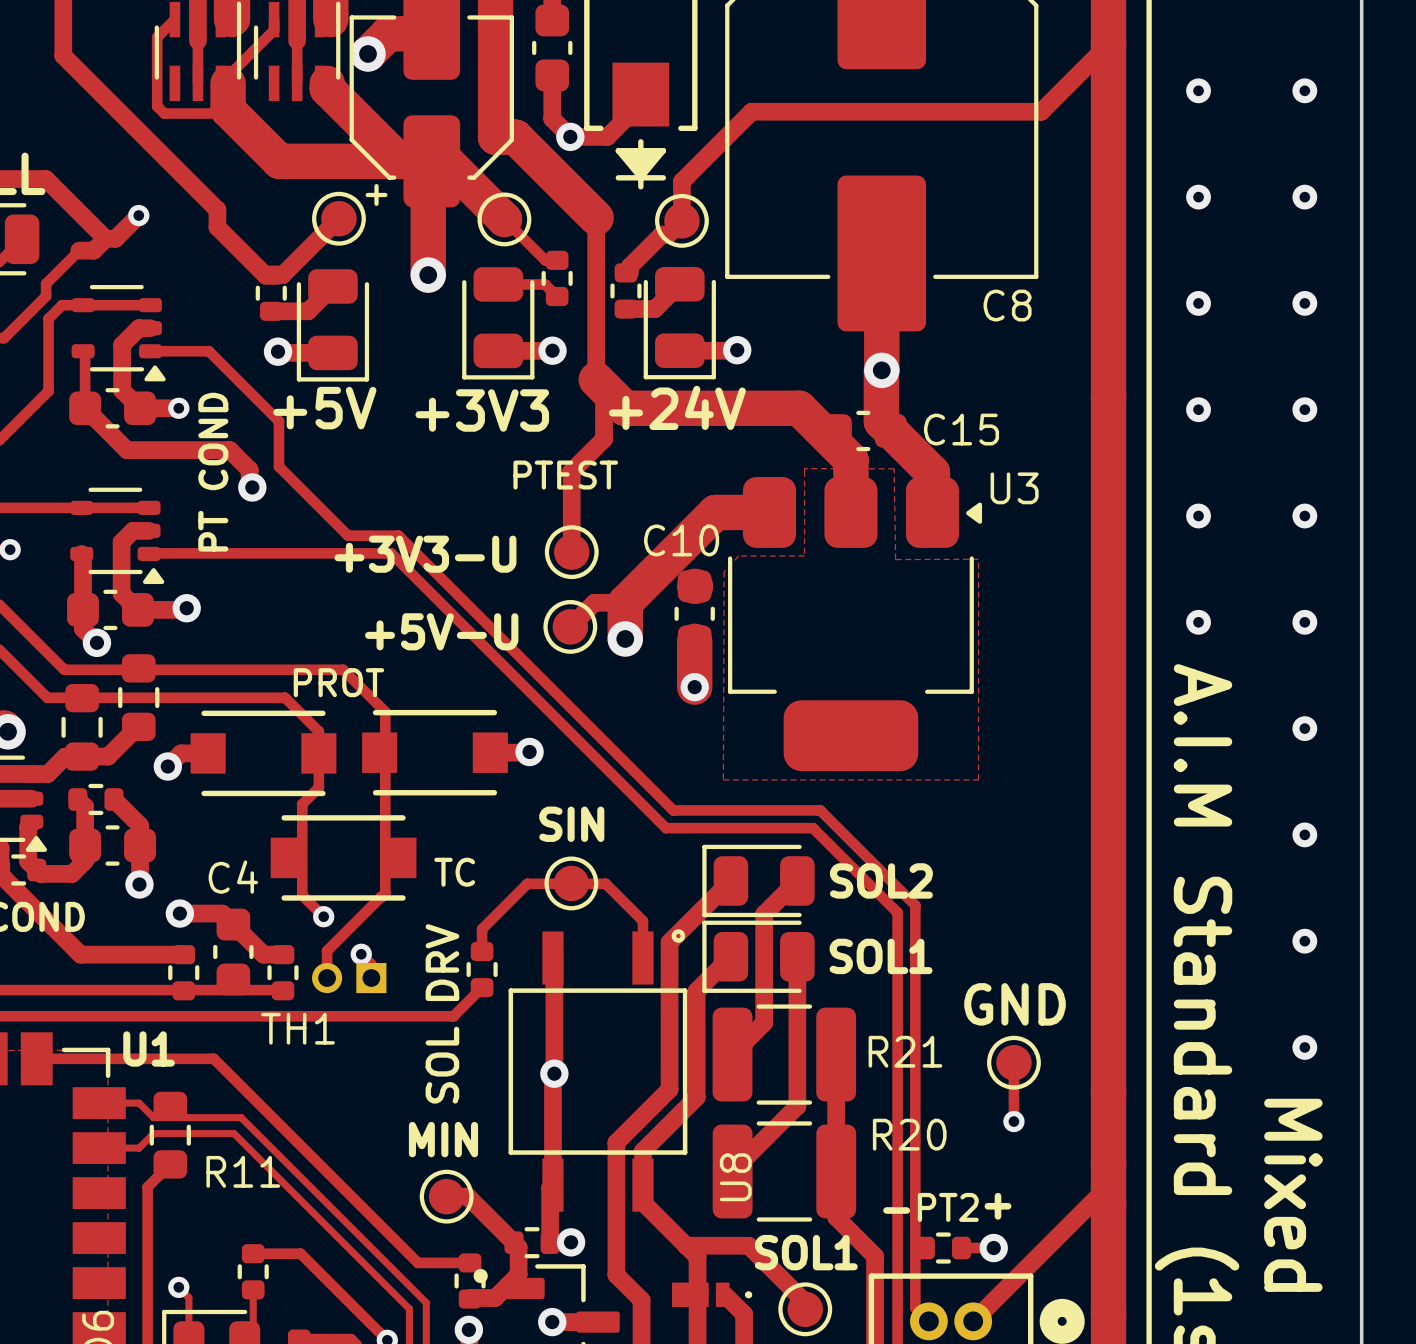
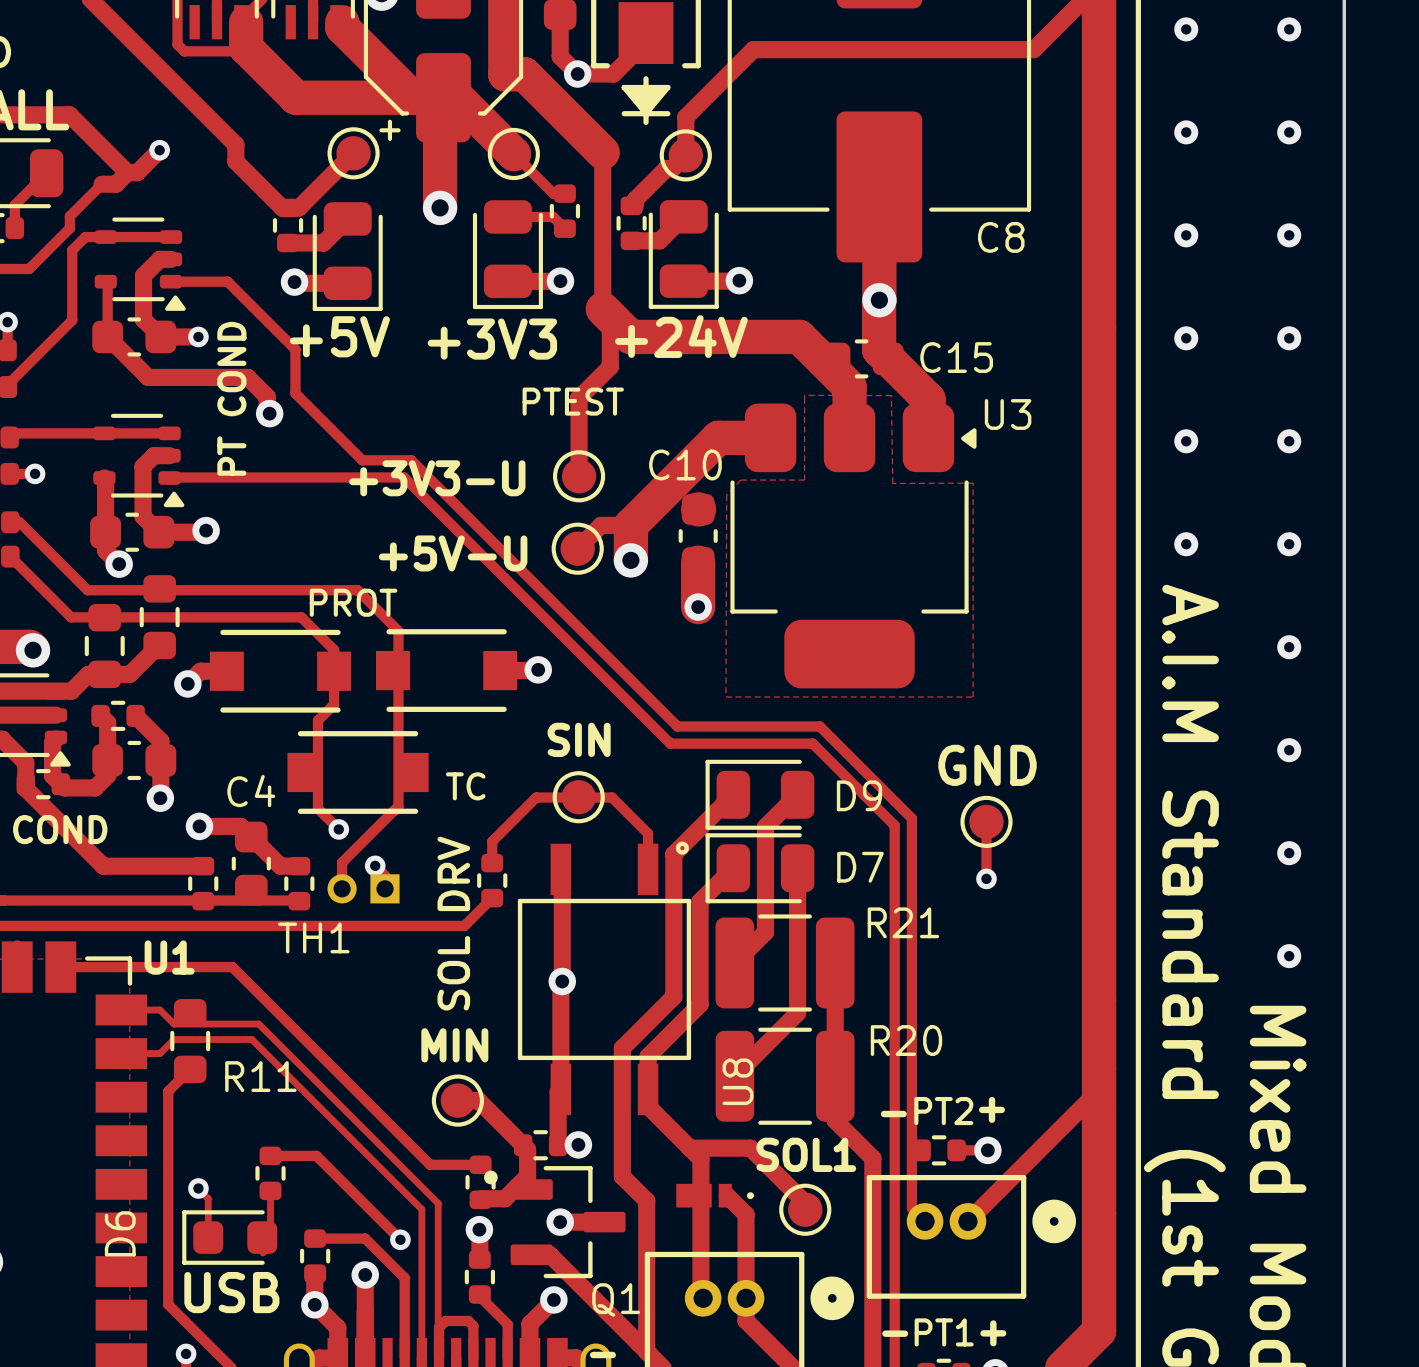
text: SOL2 (881, 880) -> none
D9 name: none -> D9 (859, 795)
D7 name: none -> D7 (860, 867)
text: SOL1 (881, 956) -> none
text position: GND (1015, 1004) -> GND (987, 765)
R21 name position: R21 (905, 1051) -> R21 (903, 922)
track: (1013, 1062) (1013, 1121) -> (986, 821) (986, 878)
part position: (1013, 1062) -> (986, 821)
via position: (1013, 1121) -> (986, 878)

